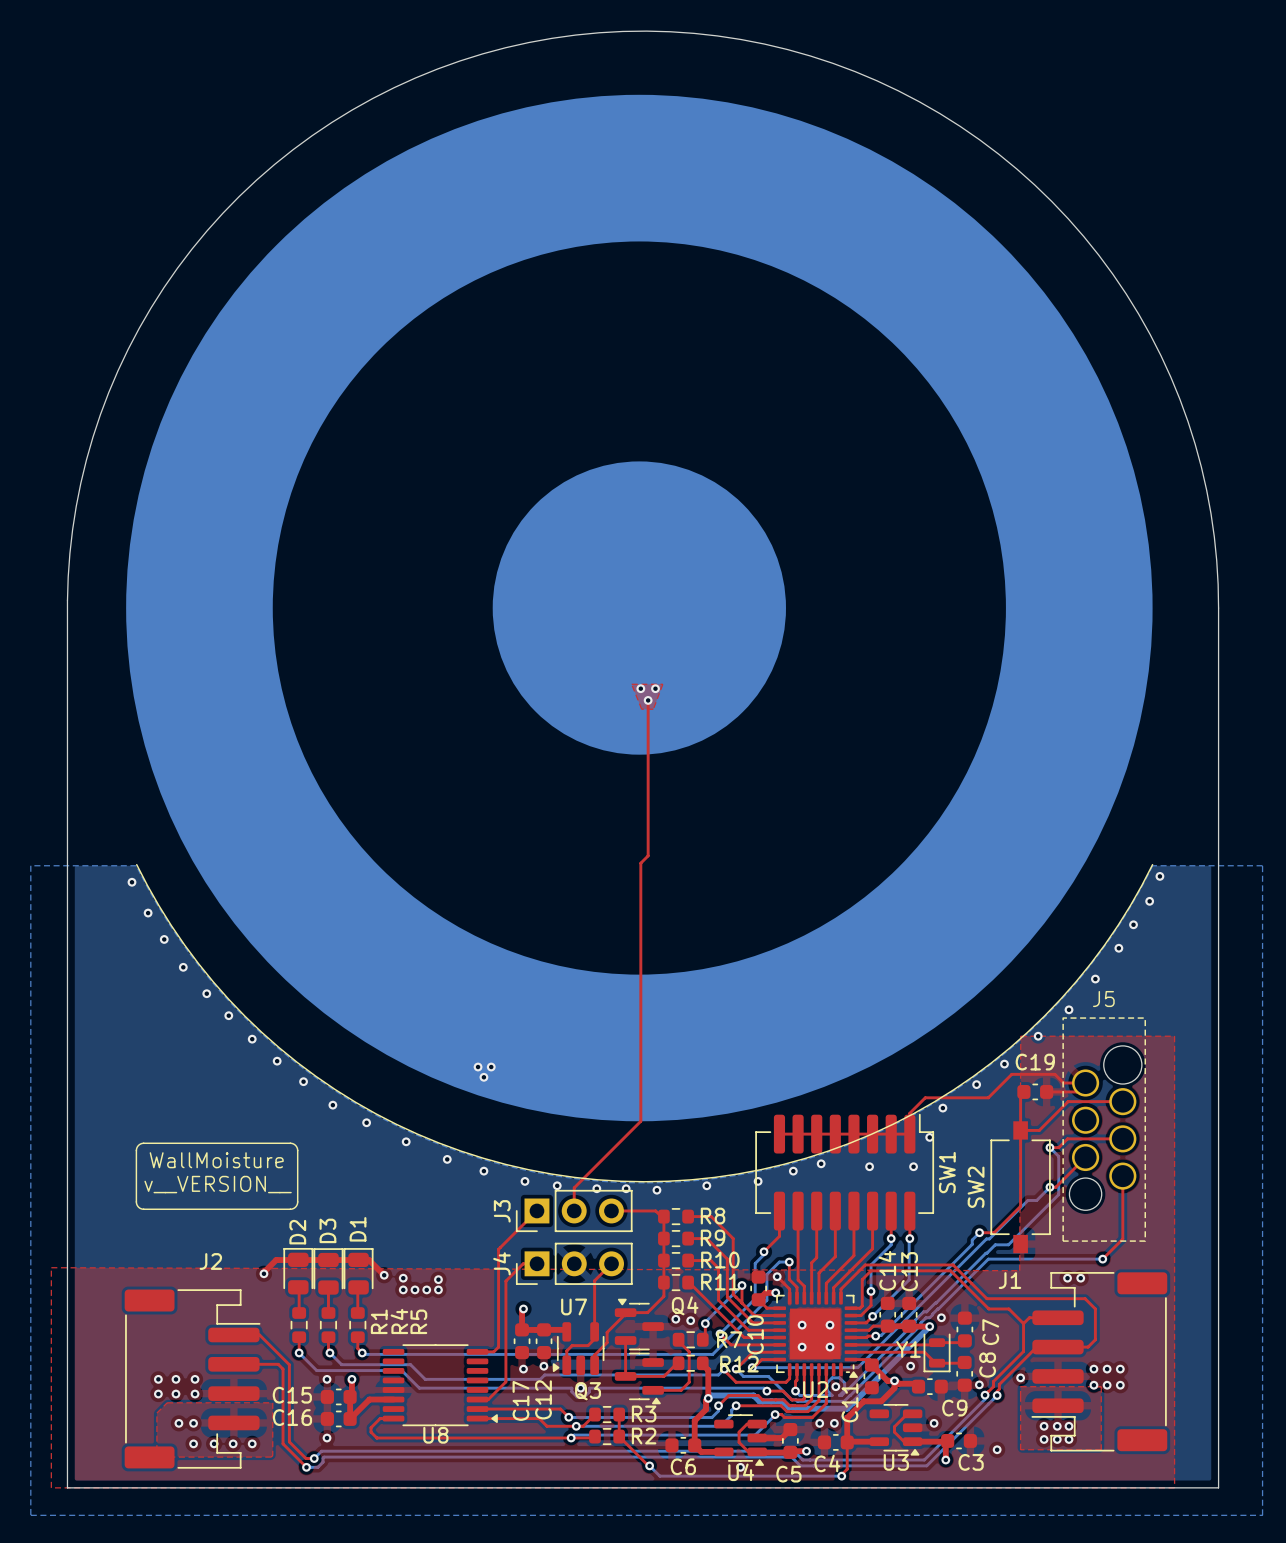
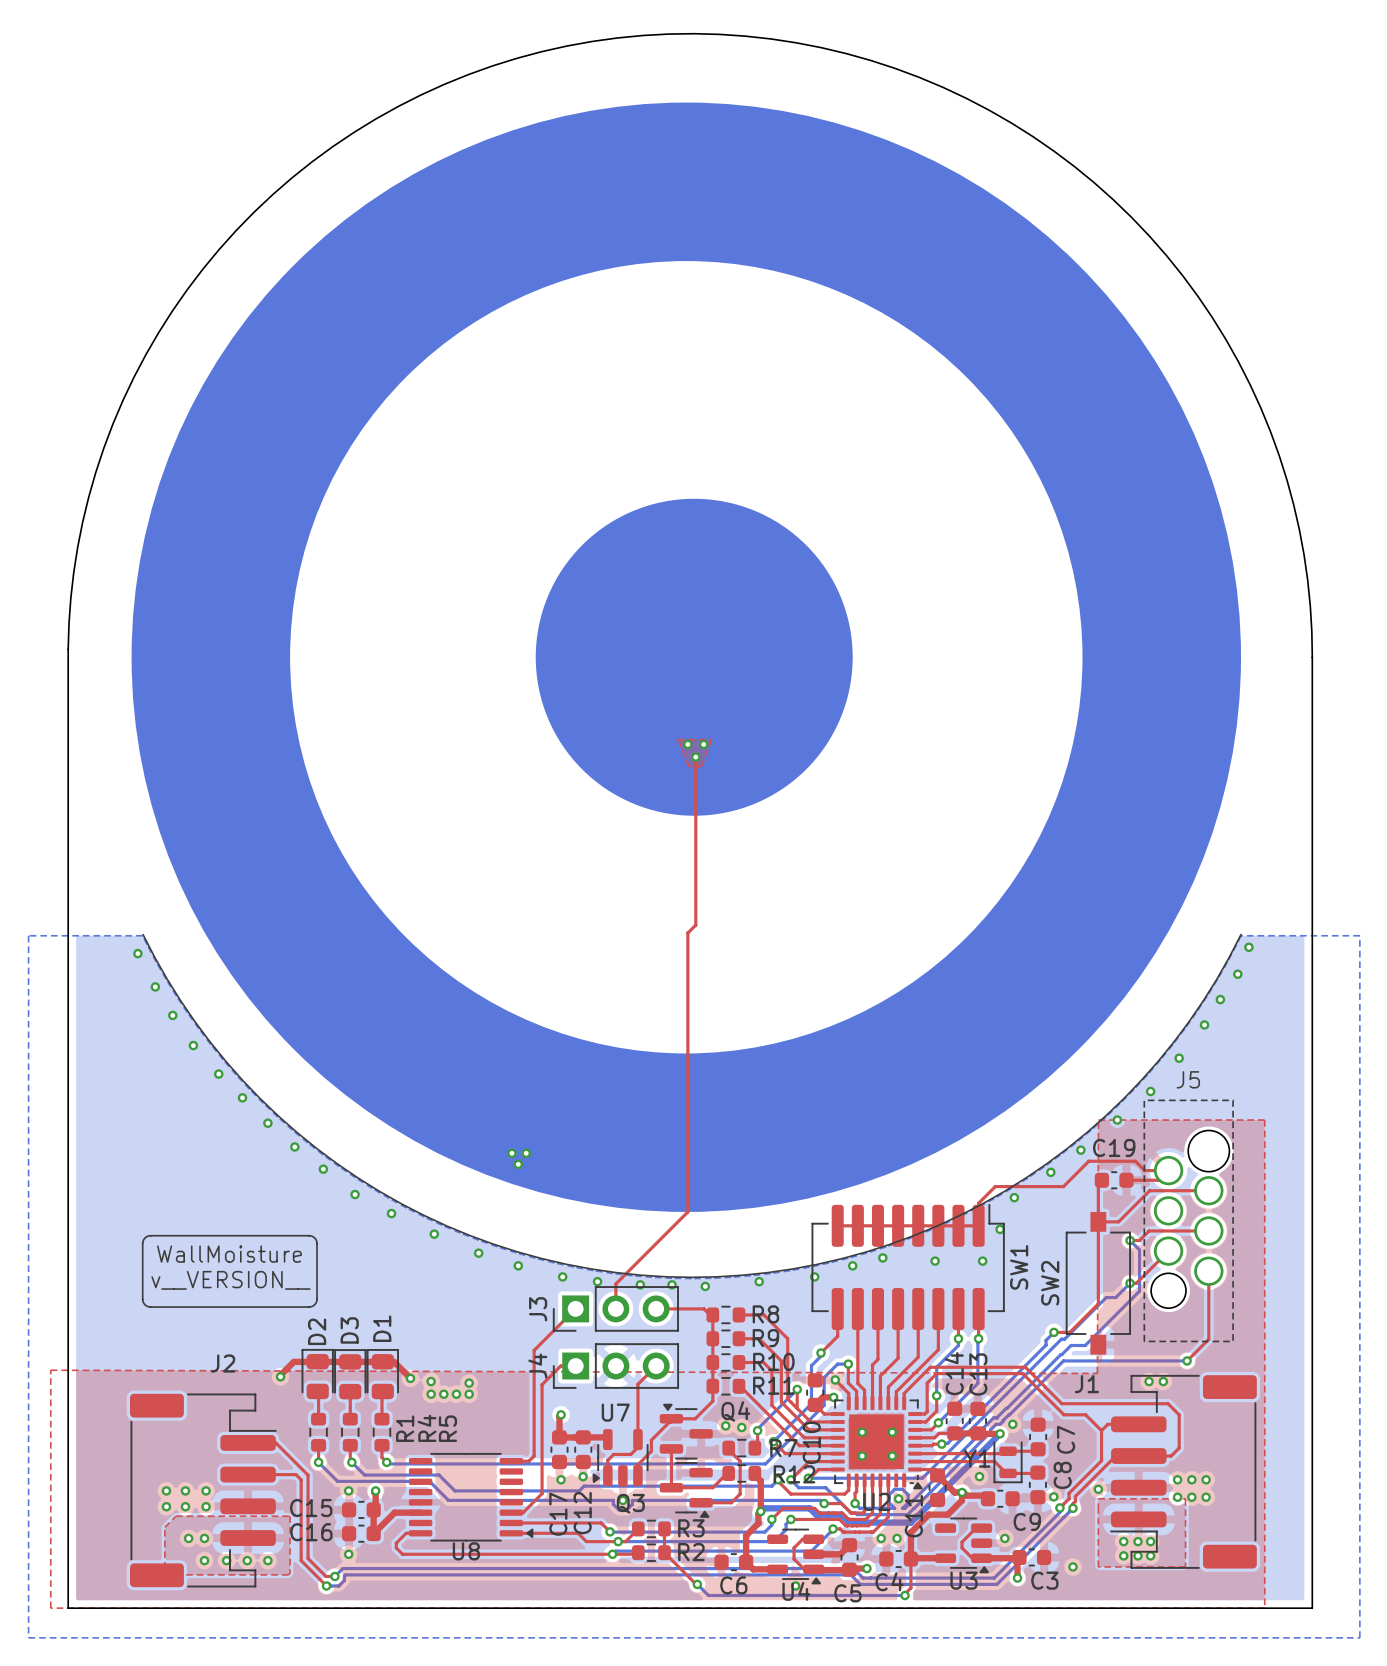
part footprint: [126, 94, 1153, 1122] -> [131, 102, 1241, 1212]

